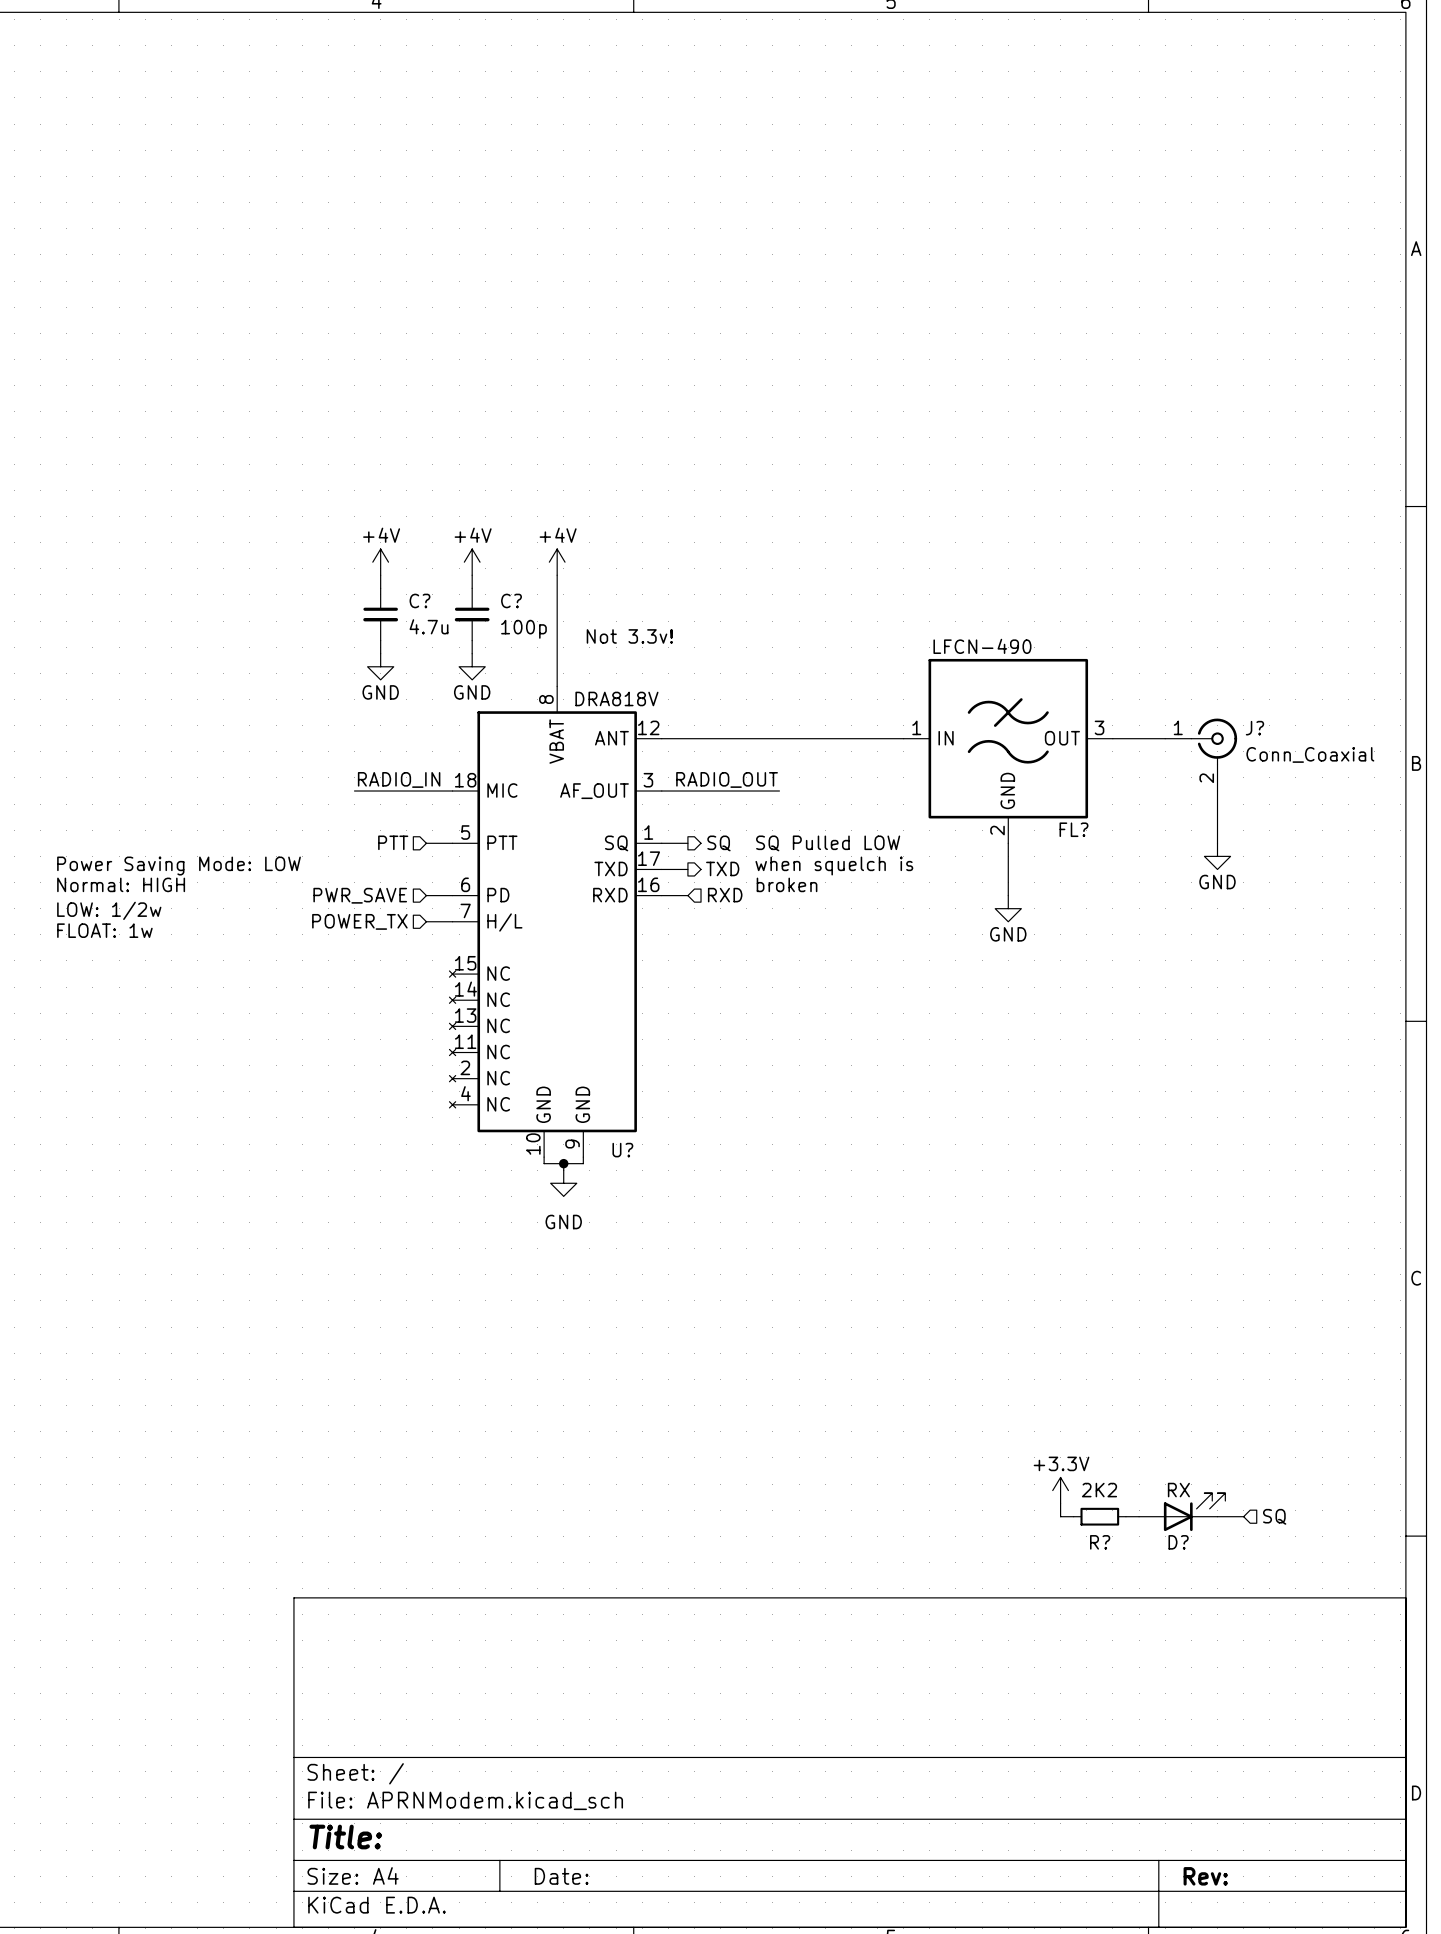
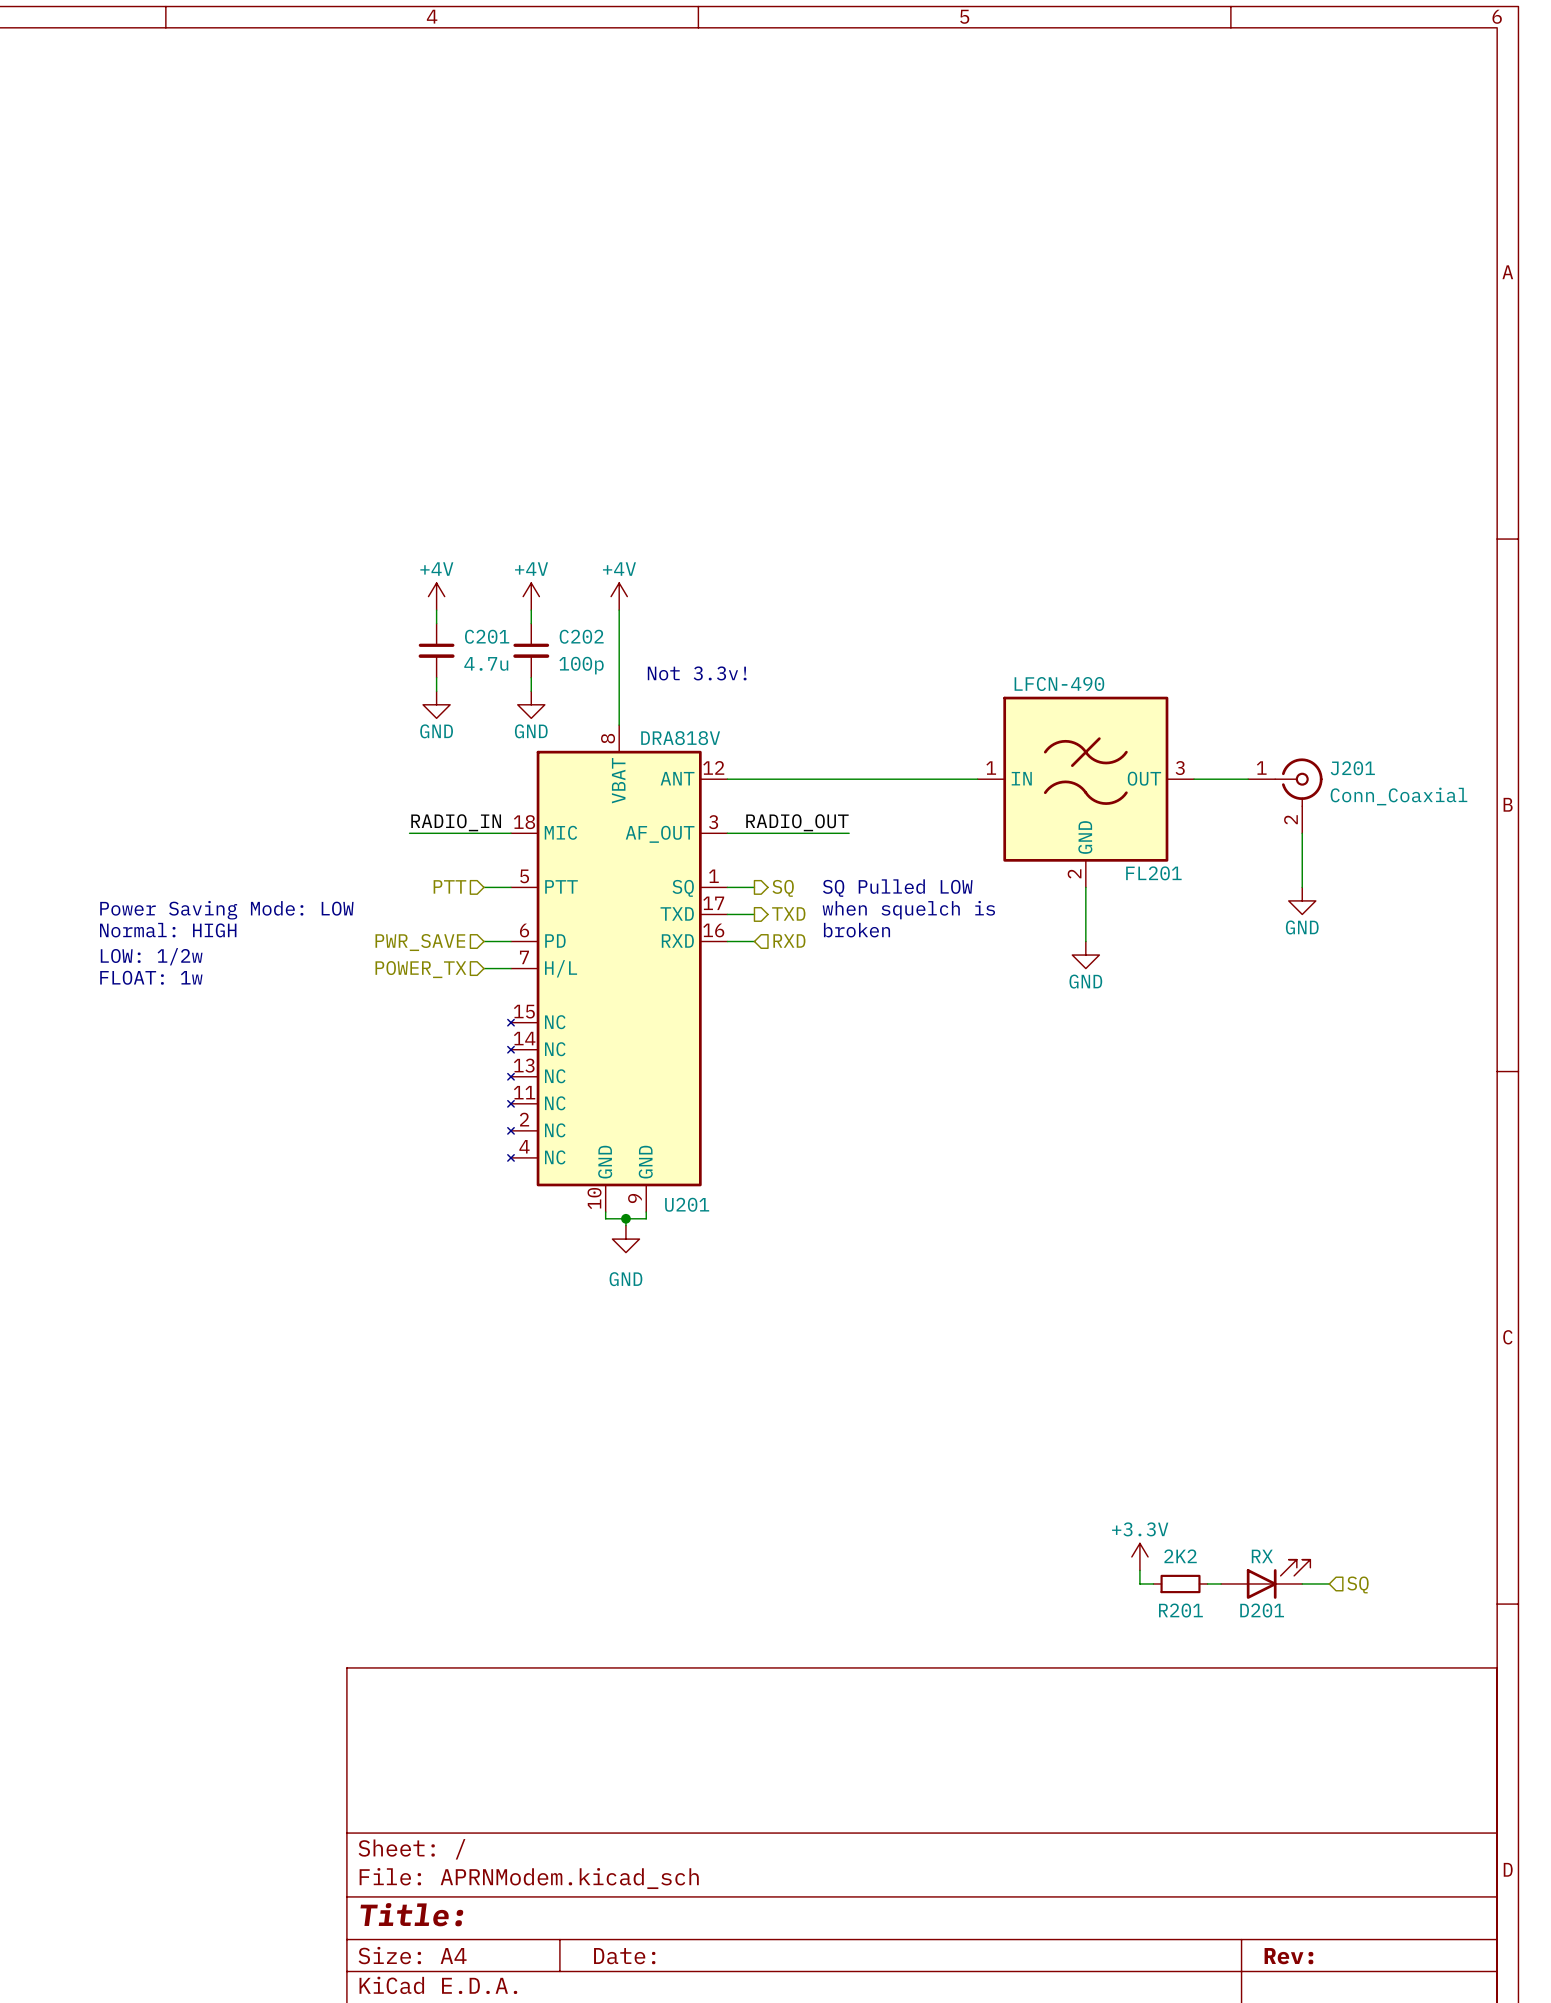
C? name: C? (419, 600) -> C201 (487, 636)
C? name: C? (511, 600) -> C202 (581, 636)
J? name: J? (1254, 728) -> J201 (1352, 768)
FL? name: FL? (1073, 829) -> FL201 (1153, 873)
U? name: U? (622, 1150) -> U201 (687, 1204)
R? name: R? (1100, 1542) -> R201 (1180, 1610)
D? name: D? (1178, 1542) -> D201 (1262, 1610)

